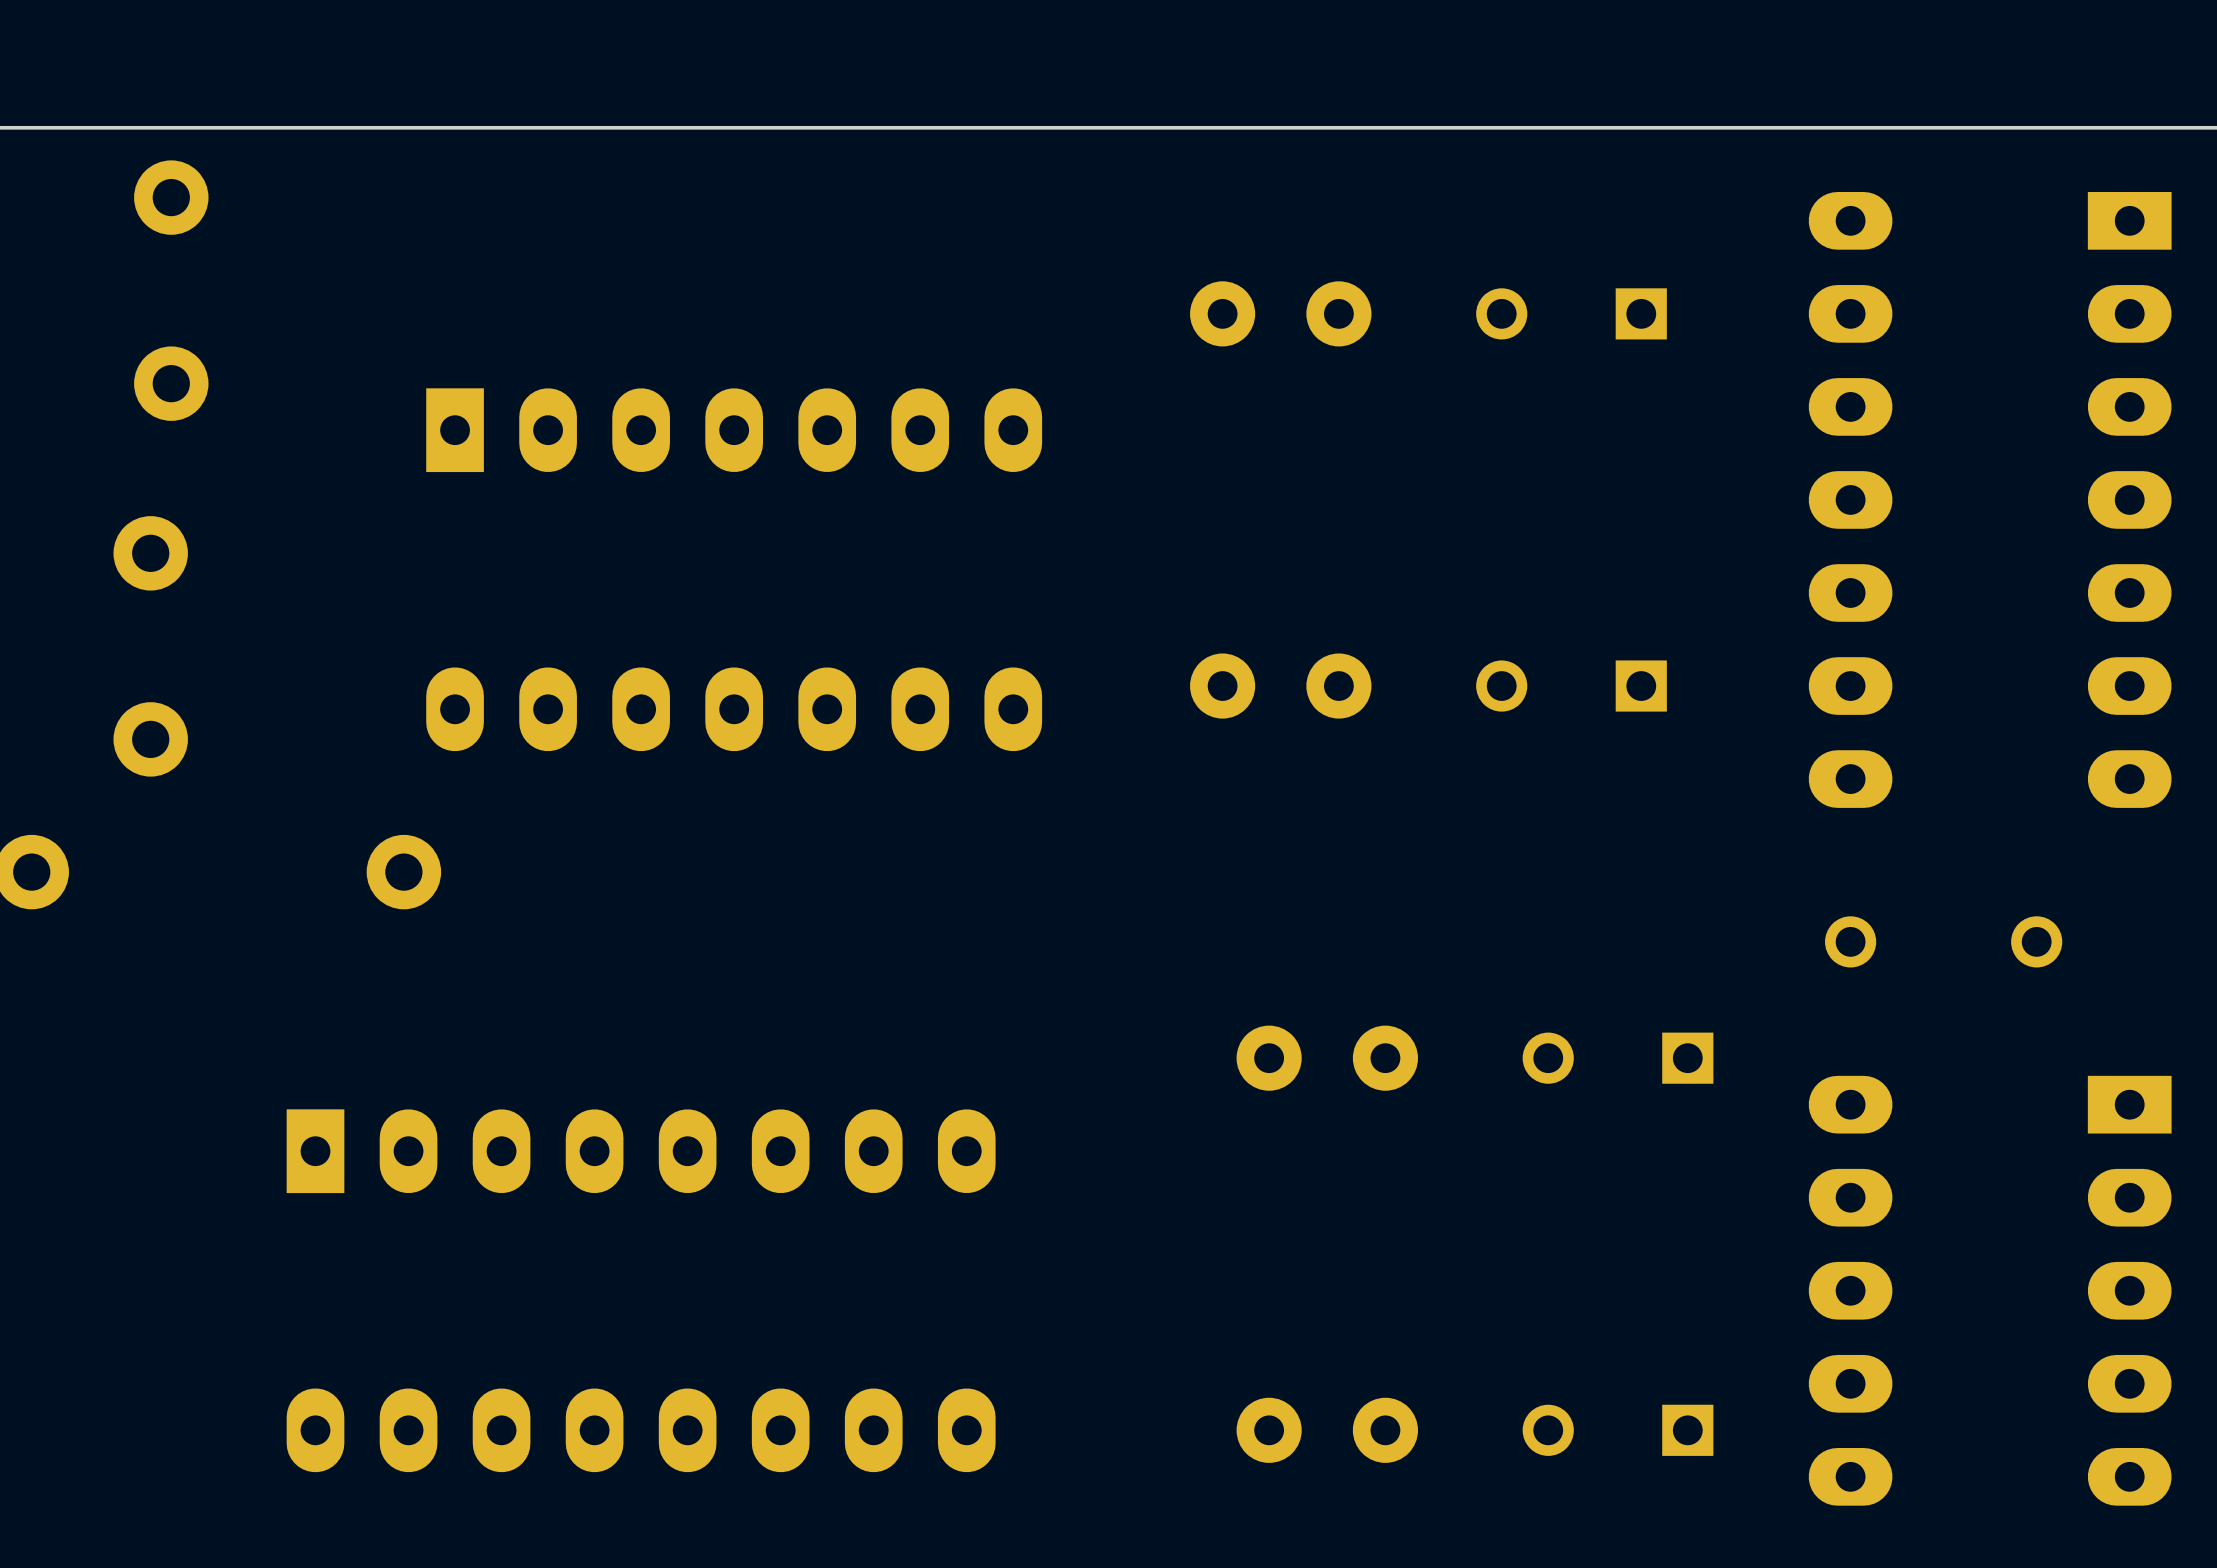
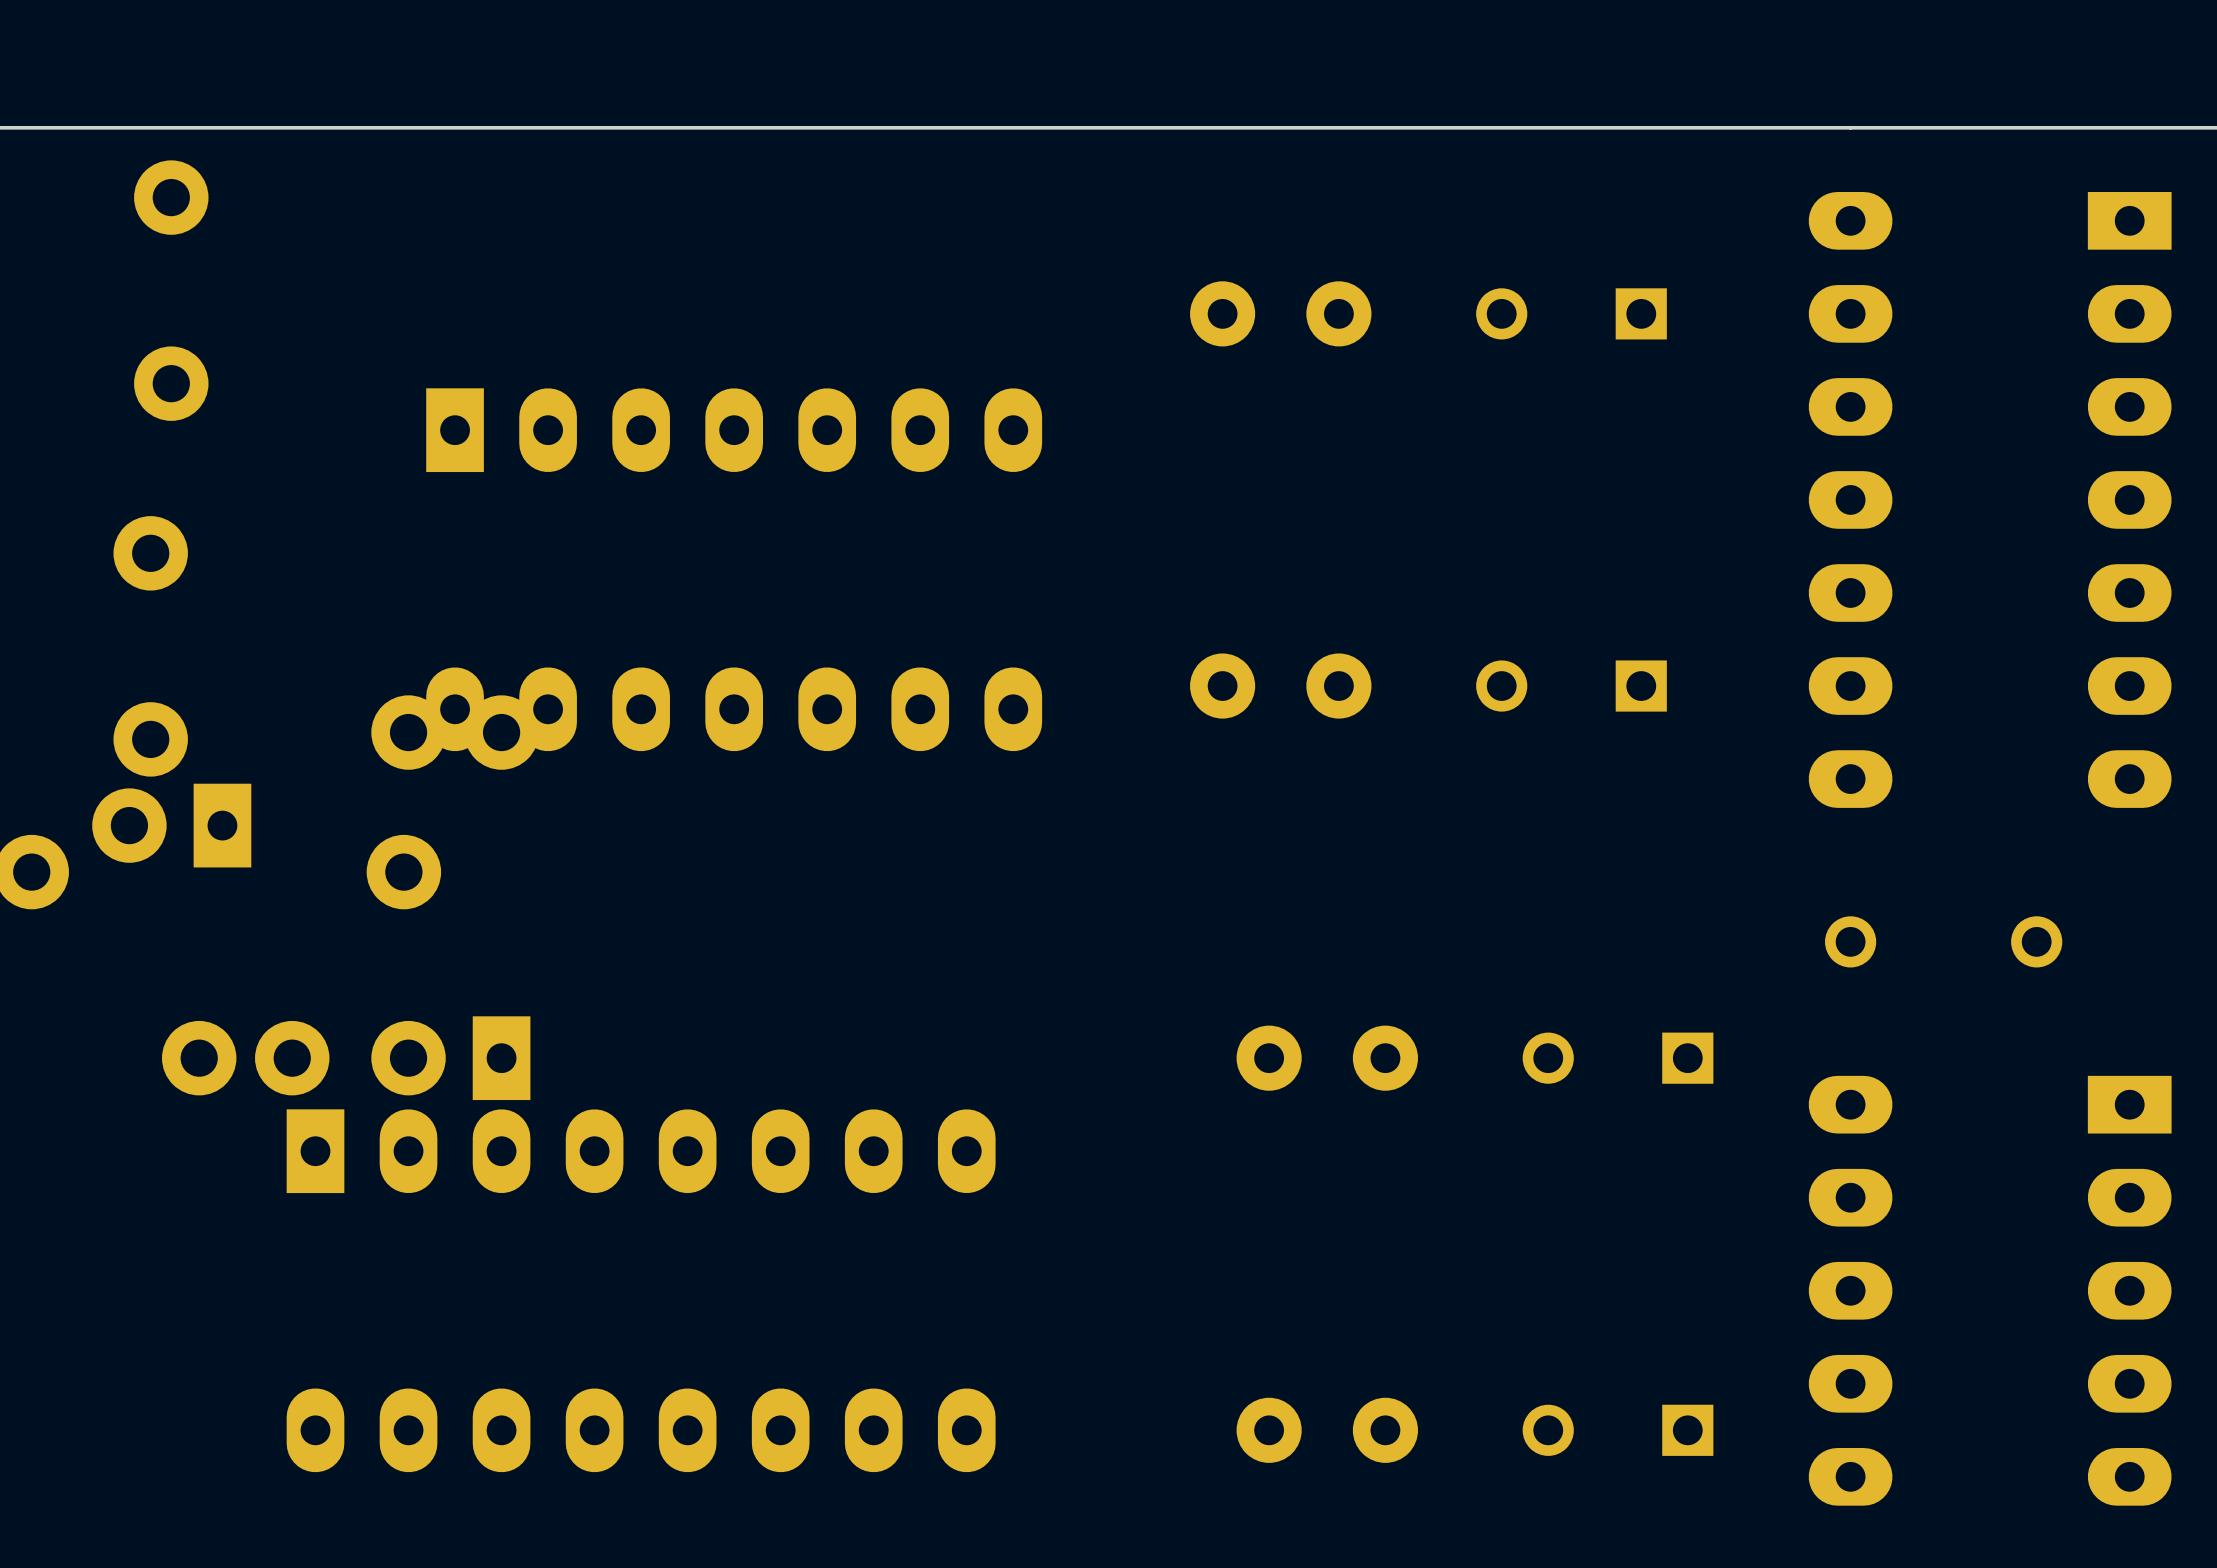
part: none -> (455, 732)
part: none -> (171, 825)
part: none -> (245, 1058)
part: none -> (450, 1058)

